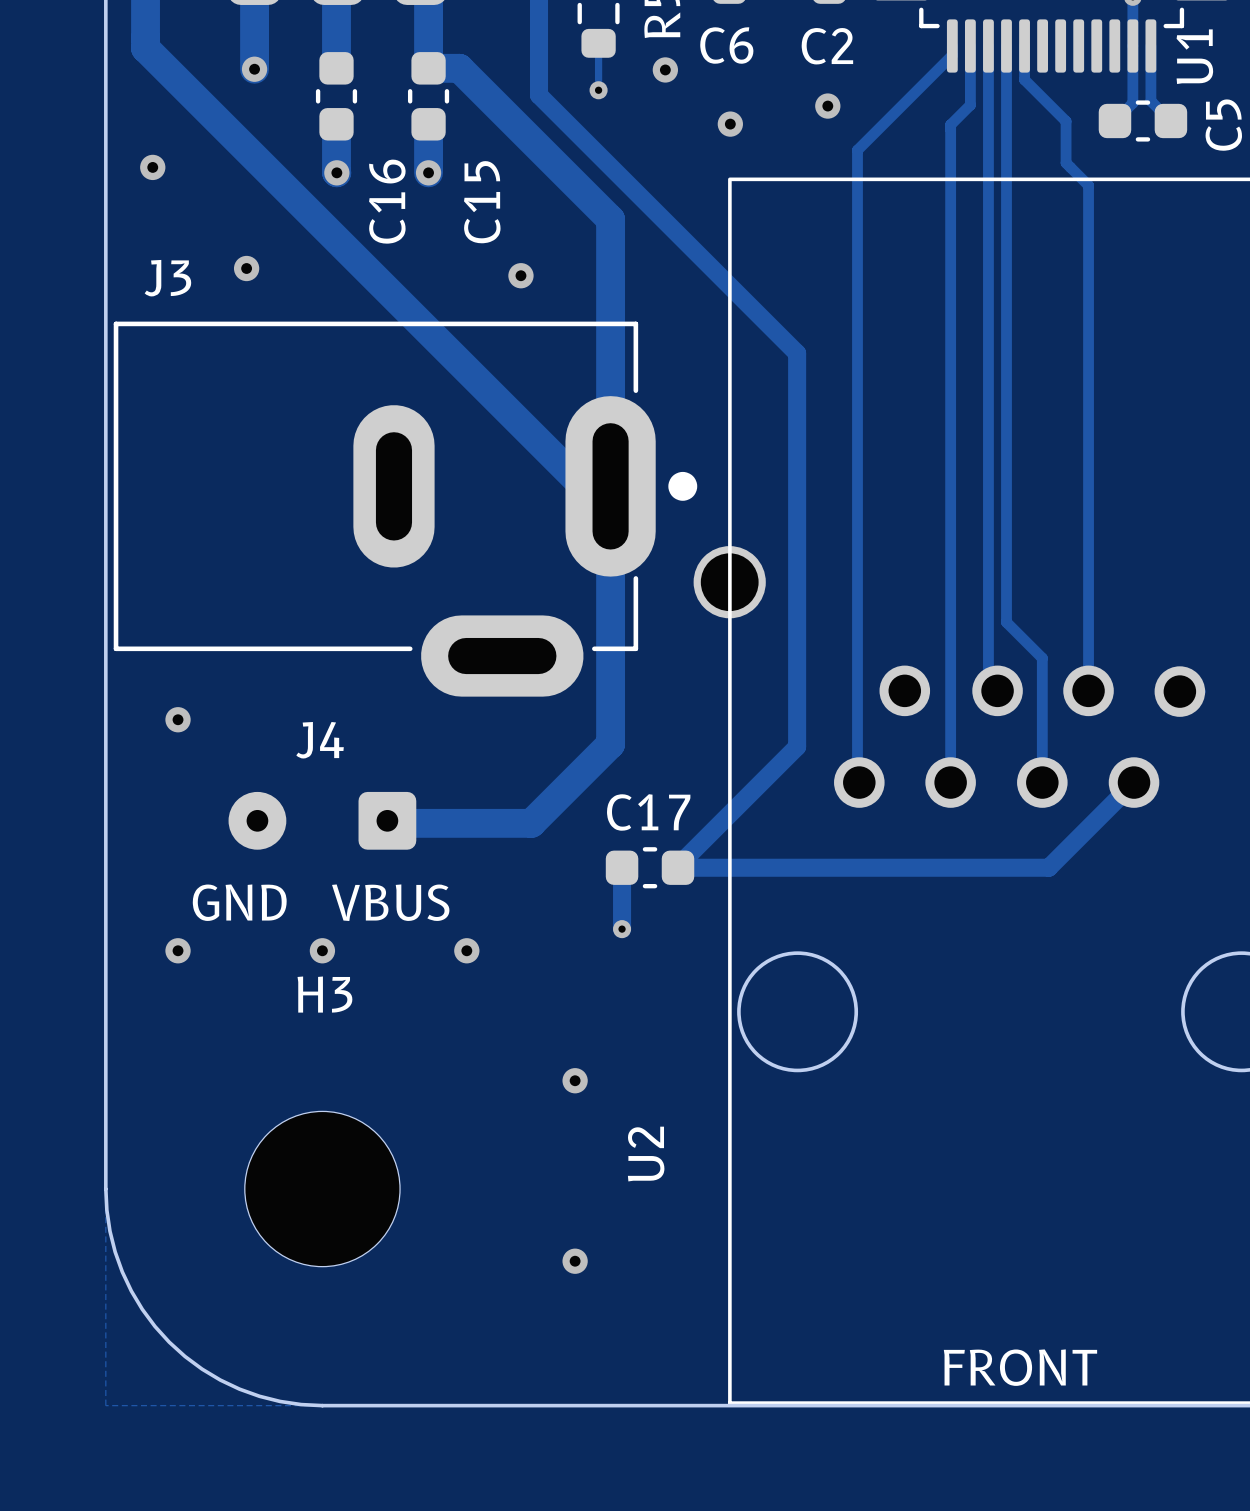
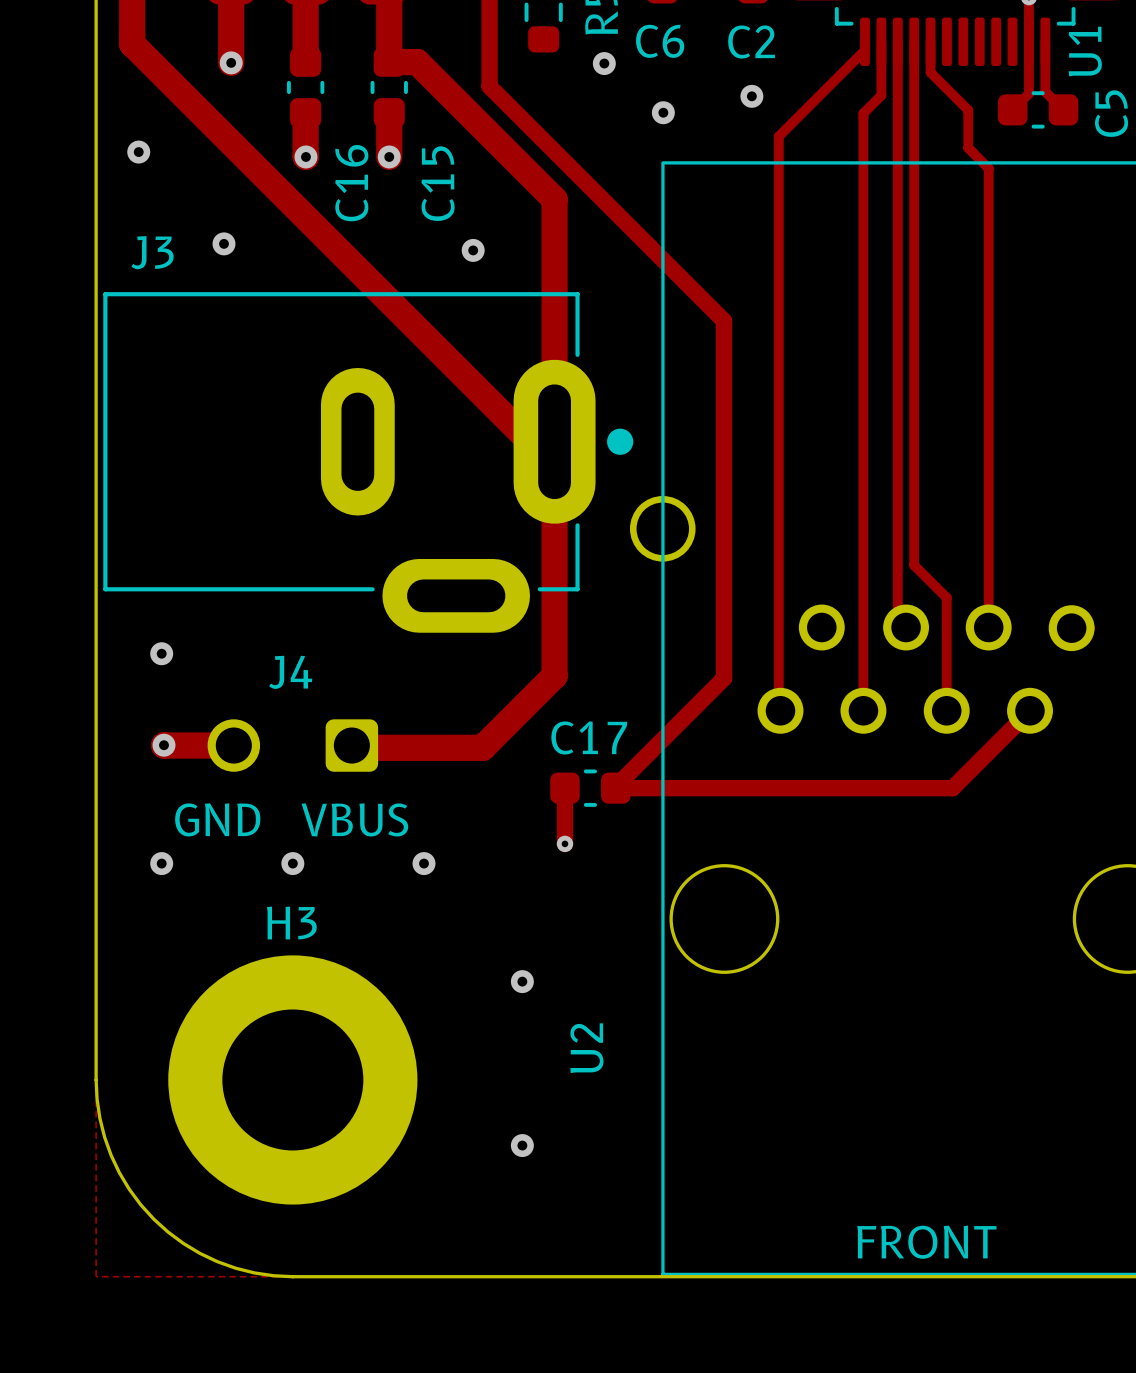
track: (598, 43) (598, 90) -> none
via: (598, 90) -> none
J4 footprint: [228, 791, 417, 850] -> [207, 719, 379, 772]
track: none -> (164, 745) (233, 745)
via: none -> (163, 745)
H3 footprint: [244, 1111, 401, 1267] -> [168, 955, 418, 1205]

